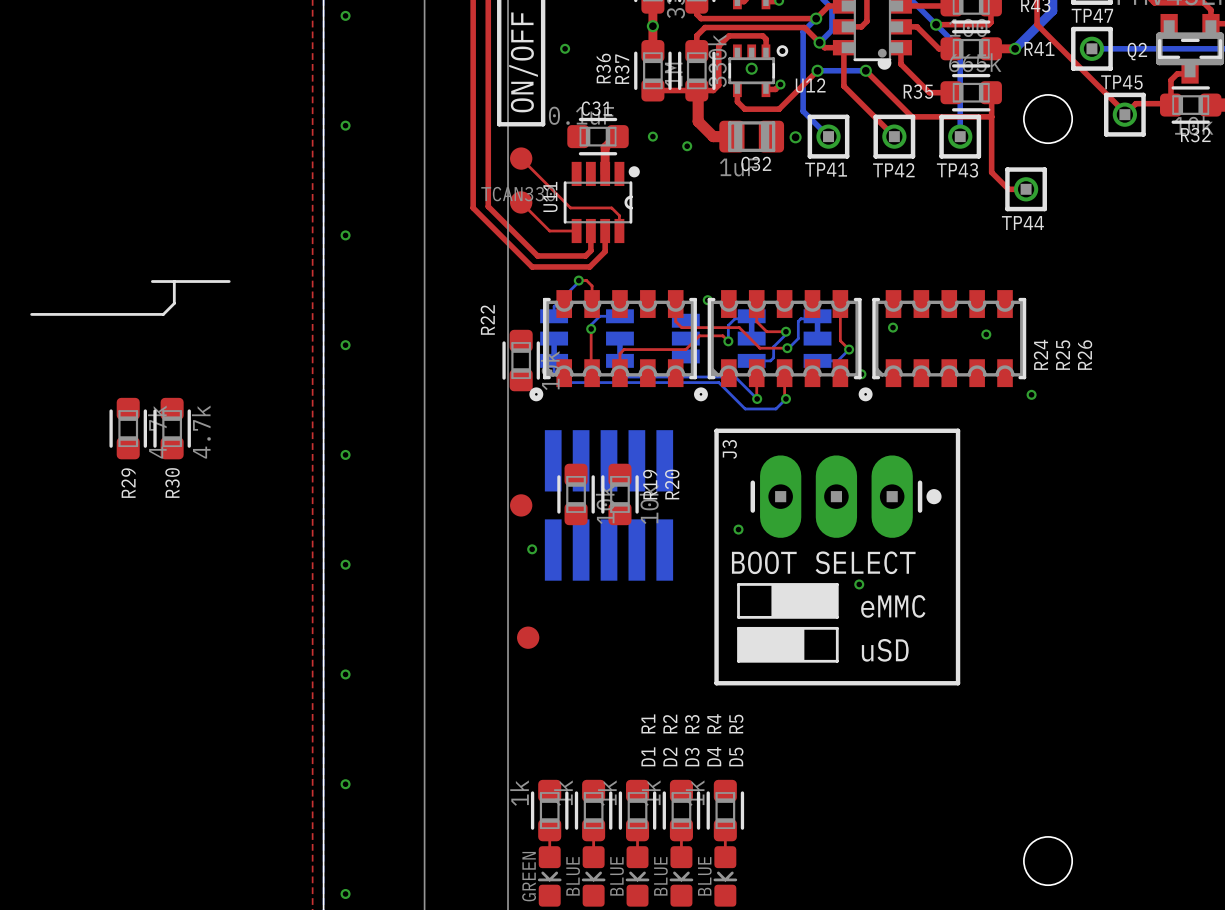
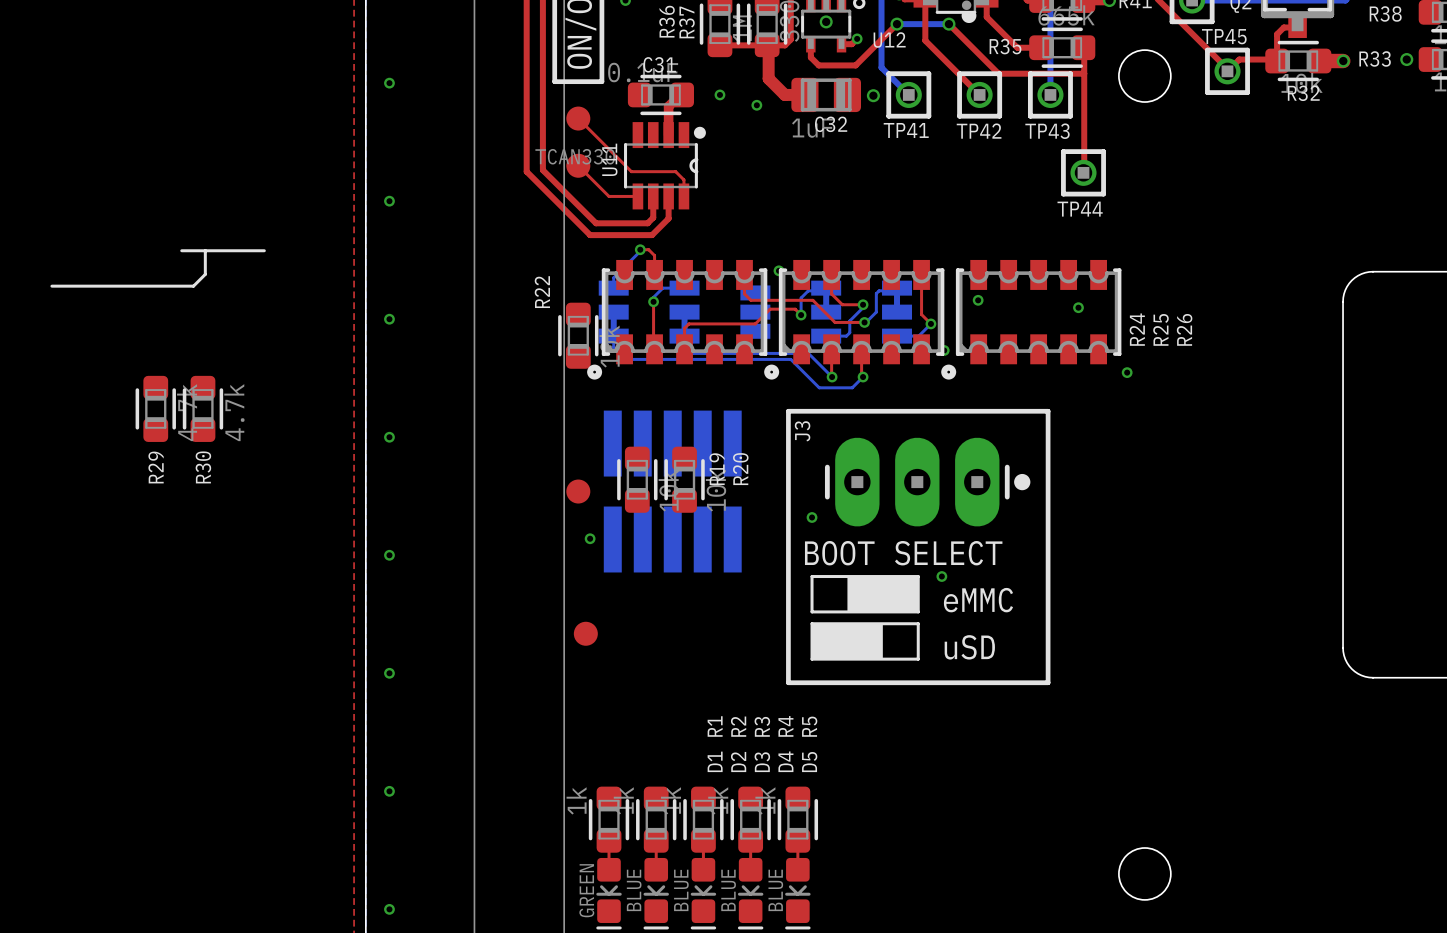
top track: (991, 172) (1008, 189) (1026, 189) -> (1084, 133) (1083, 172)
TP44 position: (1026, 189) -> (1083, 172)

